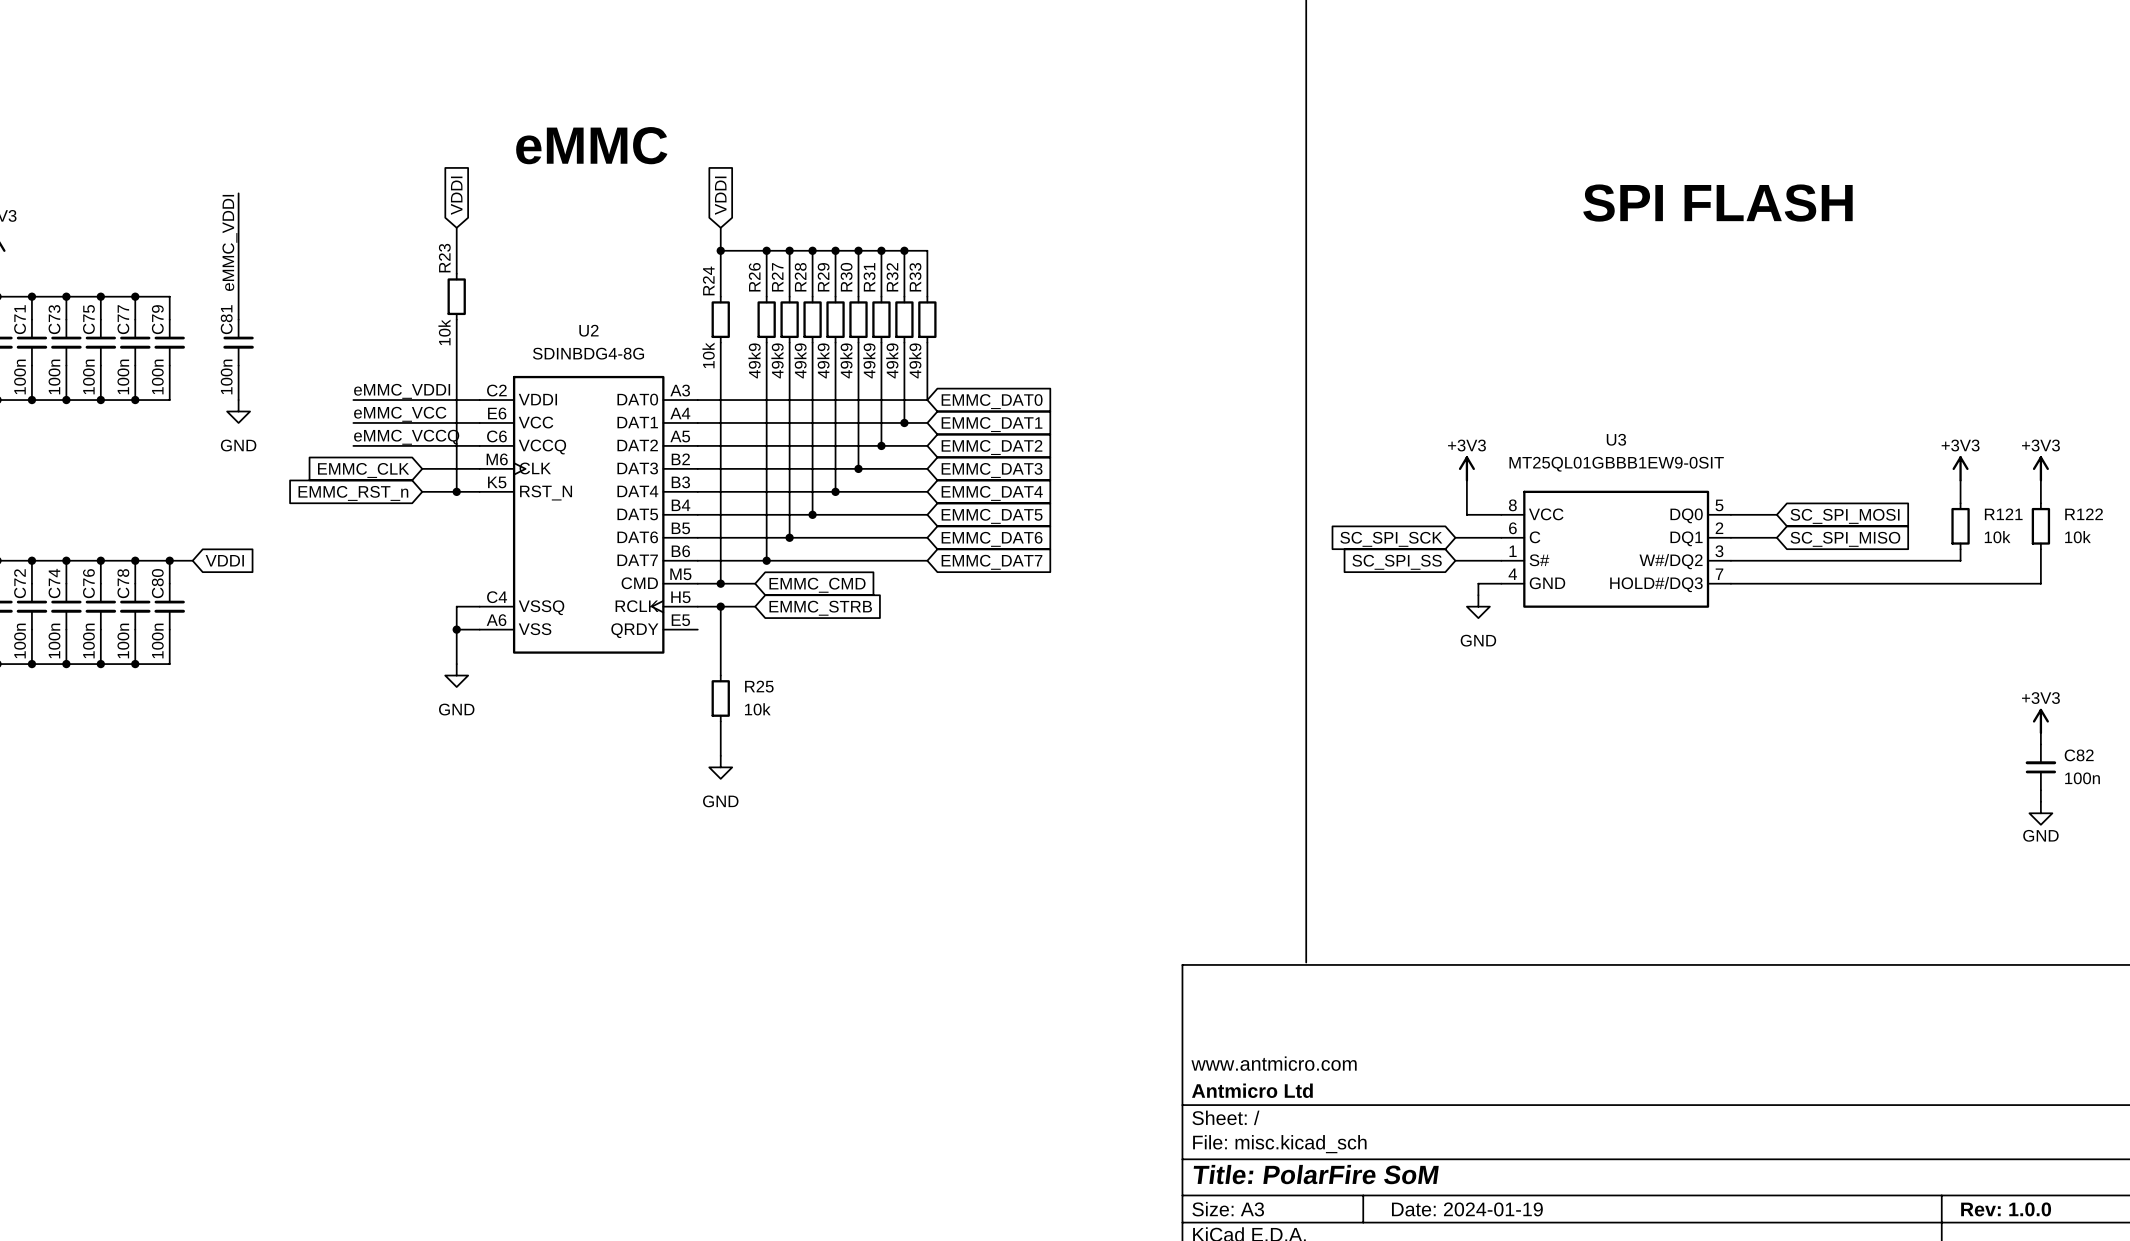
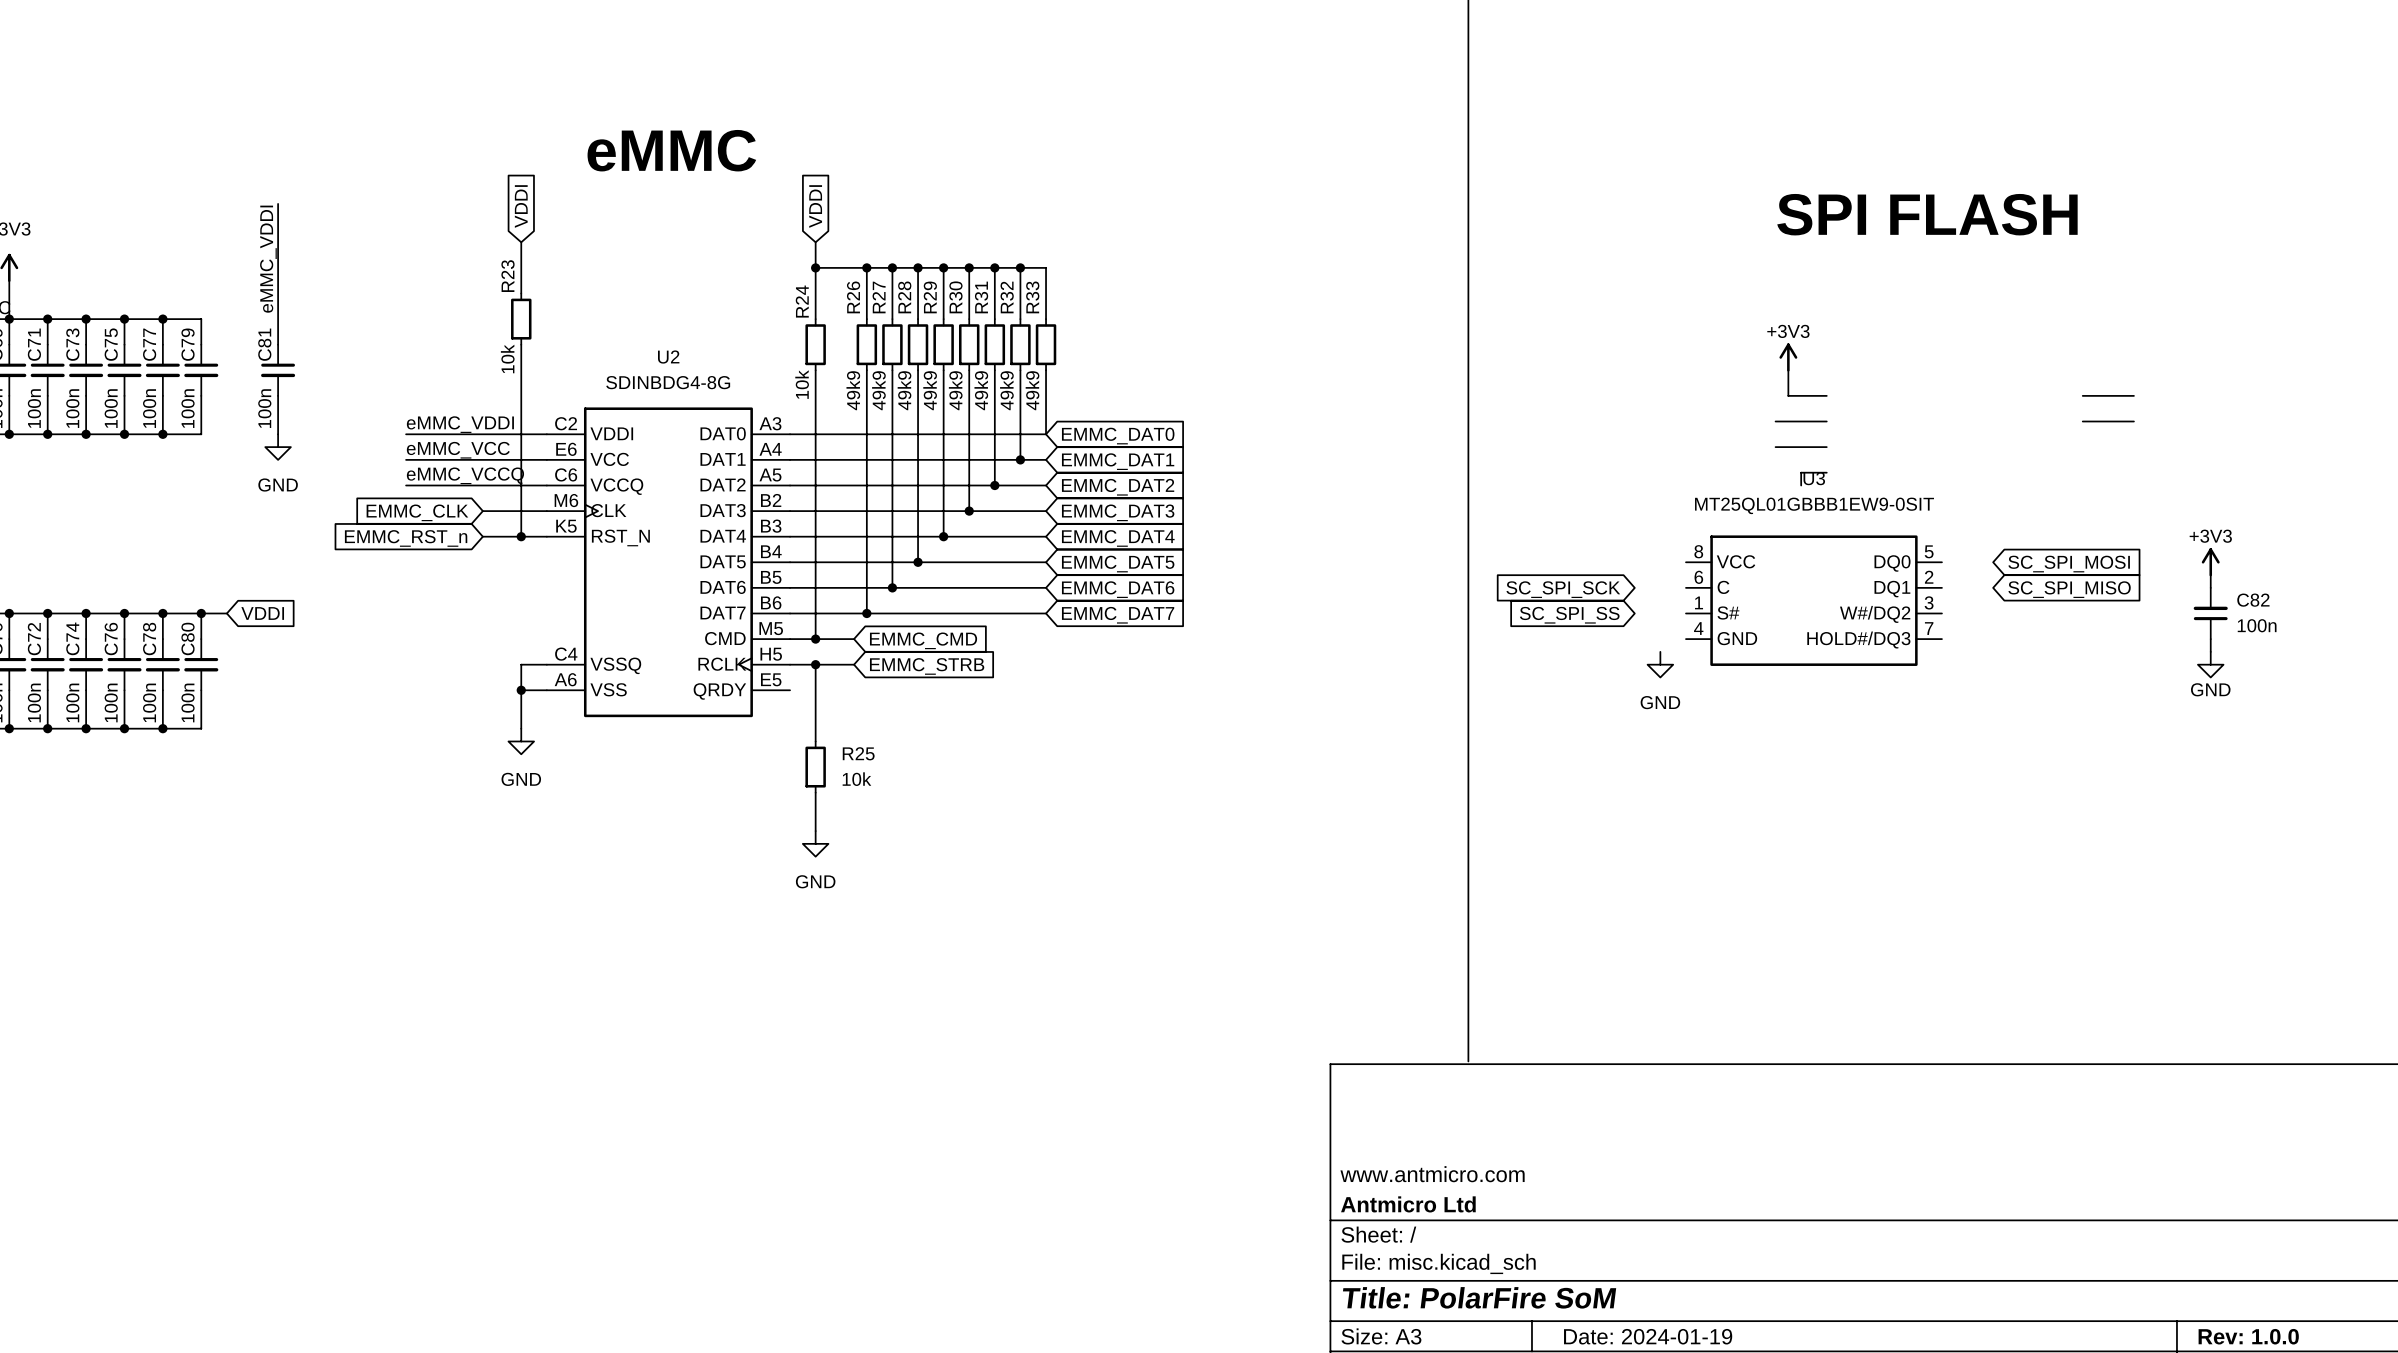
wire: none -> (1788, 370) (1788, 395) (1826, 395)
power symbol position: +3V3 (1466, 468) -> +3V3 (1788, 357)
power symbol: +3V3 (1960, 468) -> none
power symbol: +3V3 (2040, 468) -> none
wire: (1466, 480) (1466, 514) (1501, 514) -> none
wire: (1960, 480) (1960, 503) -> none
wire: (2040, 480) (2040, 503) -> none
wire: (1730, 514) (1776, 514) -> (2082, 395) (2133, 395)
power symbol: none -> +3V3 (2210, 562)
R121: (1960, 526) -> none
R122: (2040, 526) -> none
wire: (1455, 537) (1501, 537) -> (1775, 421) (1826, 421)
wire: (1730, 537) (1776, 537) -> (2082, 421) (2133, 421)
wire: (1960, 549) (1960, 560) (1730, 560) -> none
wire: (2040, 549) (2040, 583) (1730, 583) -> none
wire: (1455, 560) (1501, 560) -> (1775, 447) (1826, 447)
wire: (1501, 583) (1478, 583) (1478, 595) -> (1826, 472) (1801, 472) (1801, 485)
power symbol: +3V3 (2040, 721) -> none
wire: (2040, 732) (2040, 744) -> (2210, 575) (2210, 587)
C82 position: (2040, 767) -> (2210, 613)
wire: (2040, 790) (2040, 801) -> (2210, 639) (2210, 651)
power symbol position: GND (2040, 813) -> GND (2210, 664)

